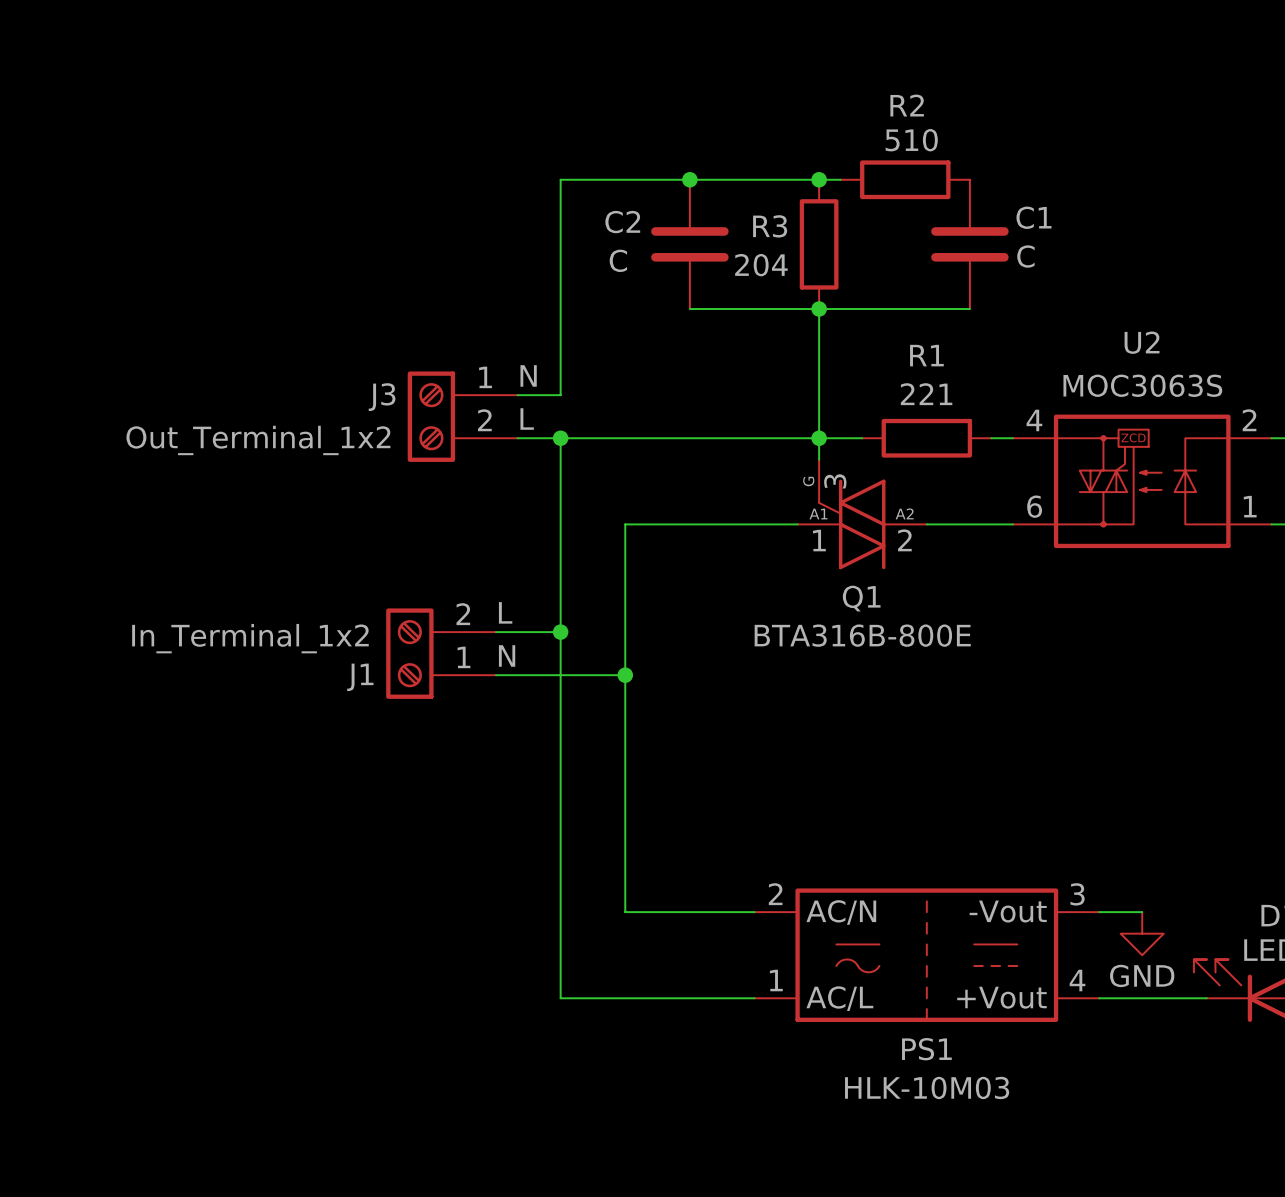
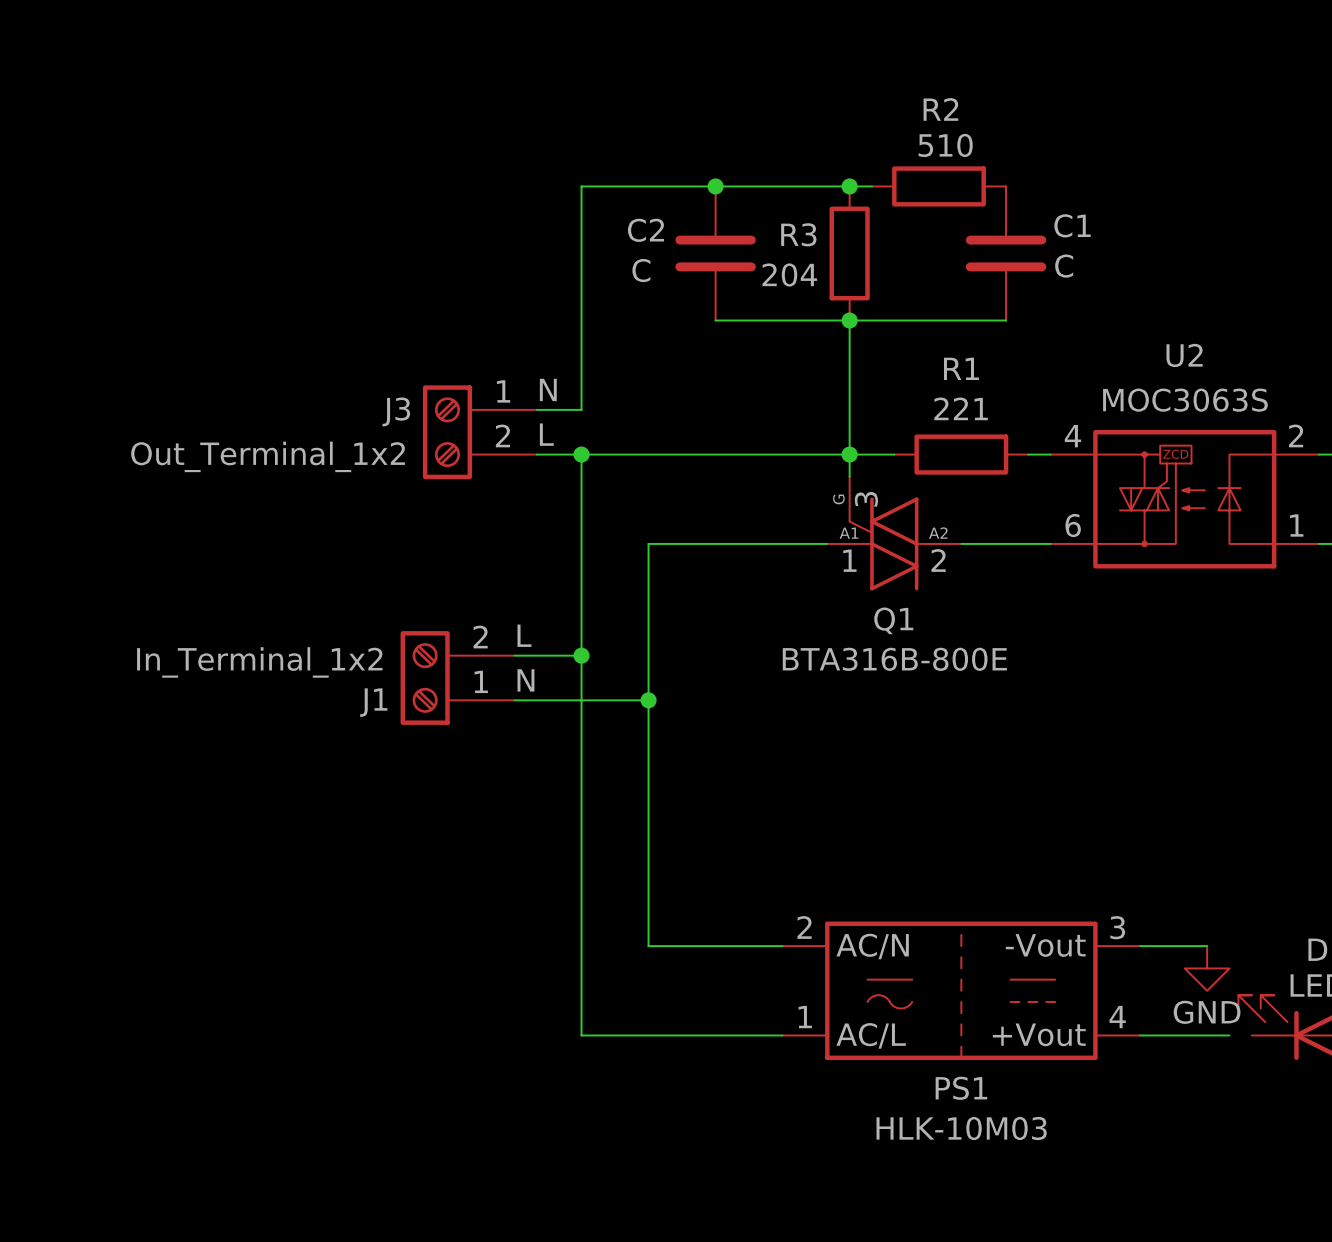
power symbol position: GND (1142, 933) -> GND (1207, 968)
wire: (1185, 998) (1206, 998) -> (1184, 946) (1207, 946)

